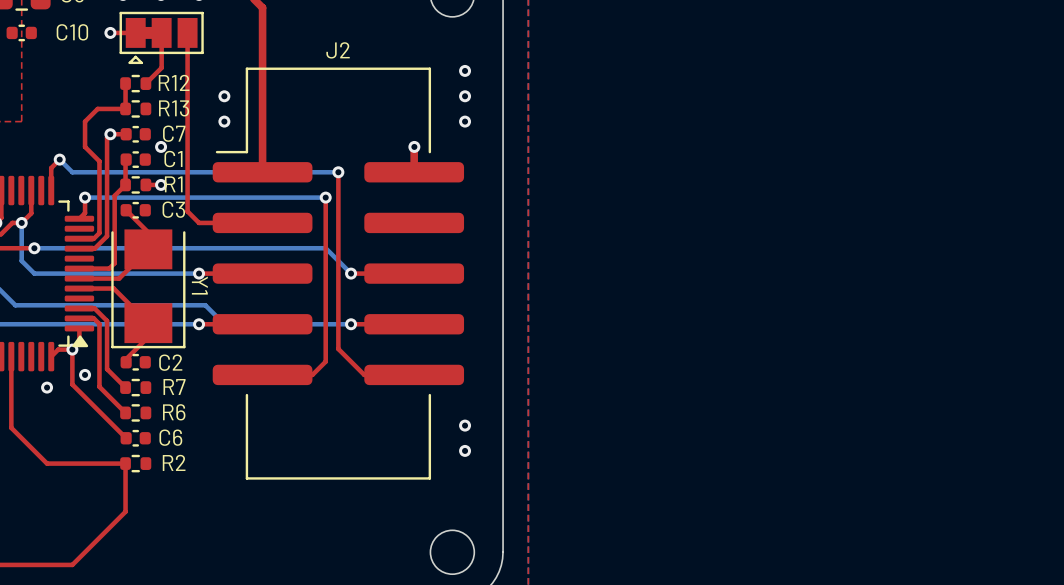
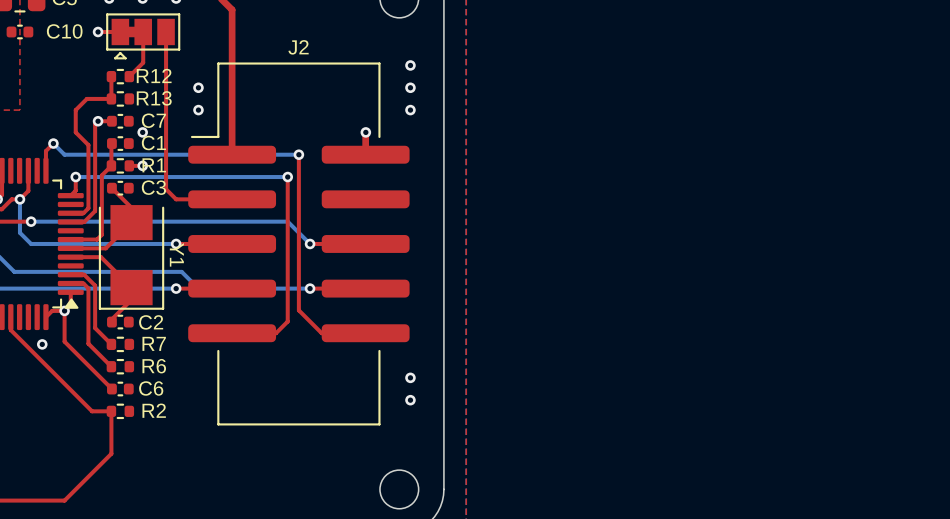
top track: (11, 371) (11, 427) (47, 463) (103, 463) -> (10, 330) (92, 411)
via: (85, 374) -> none

